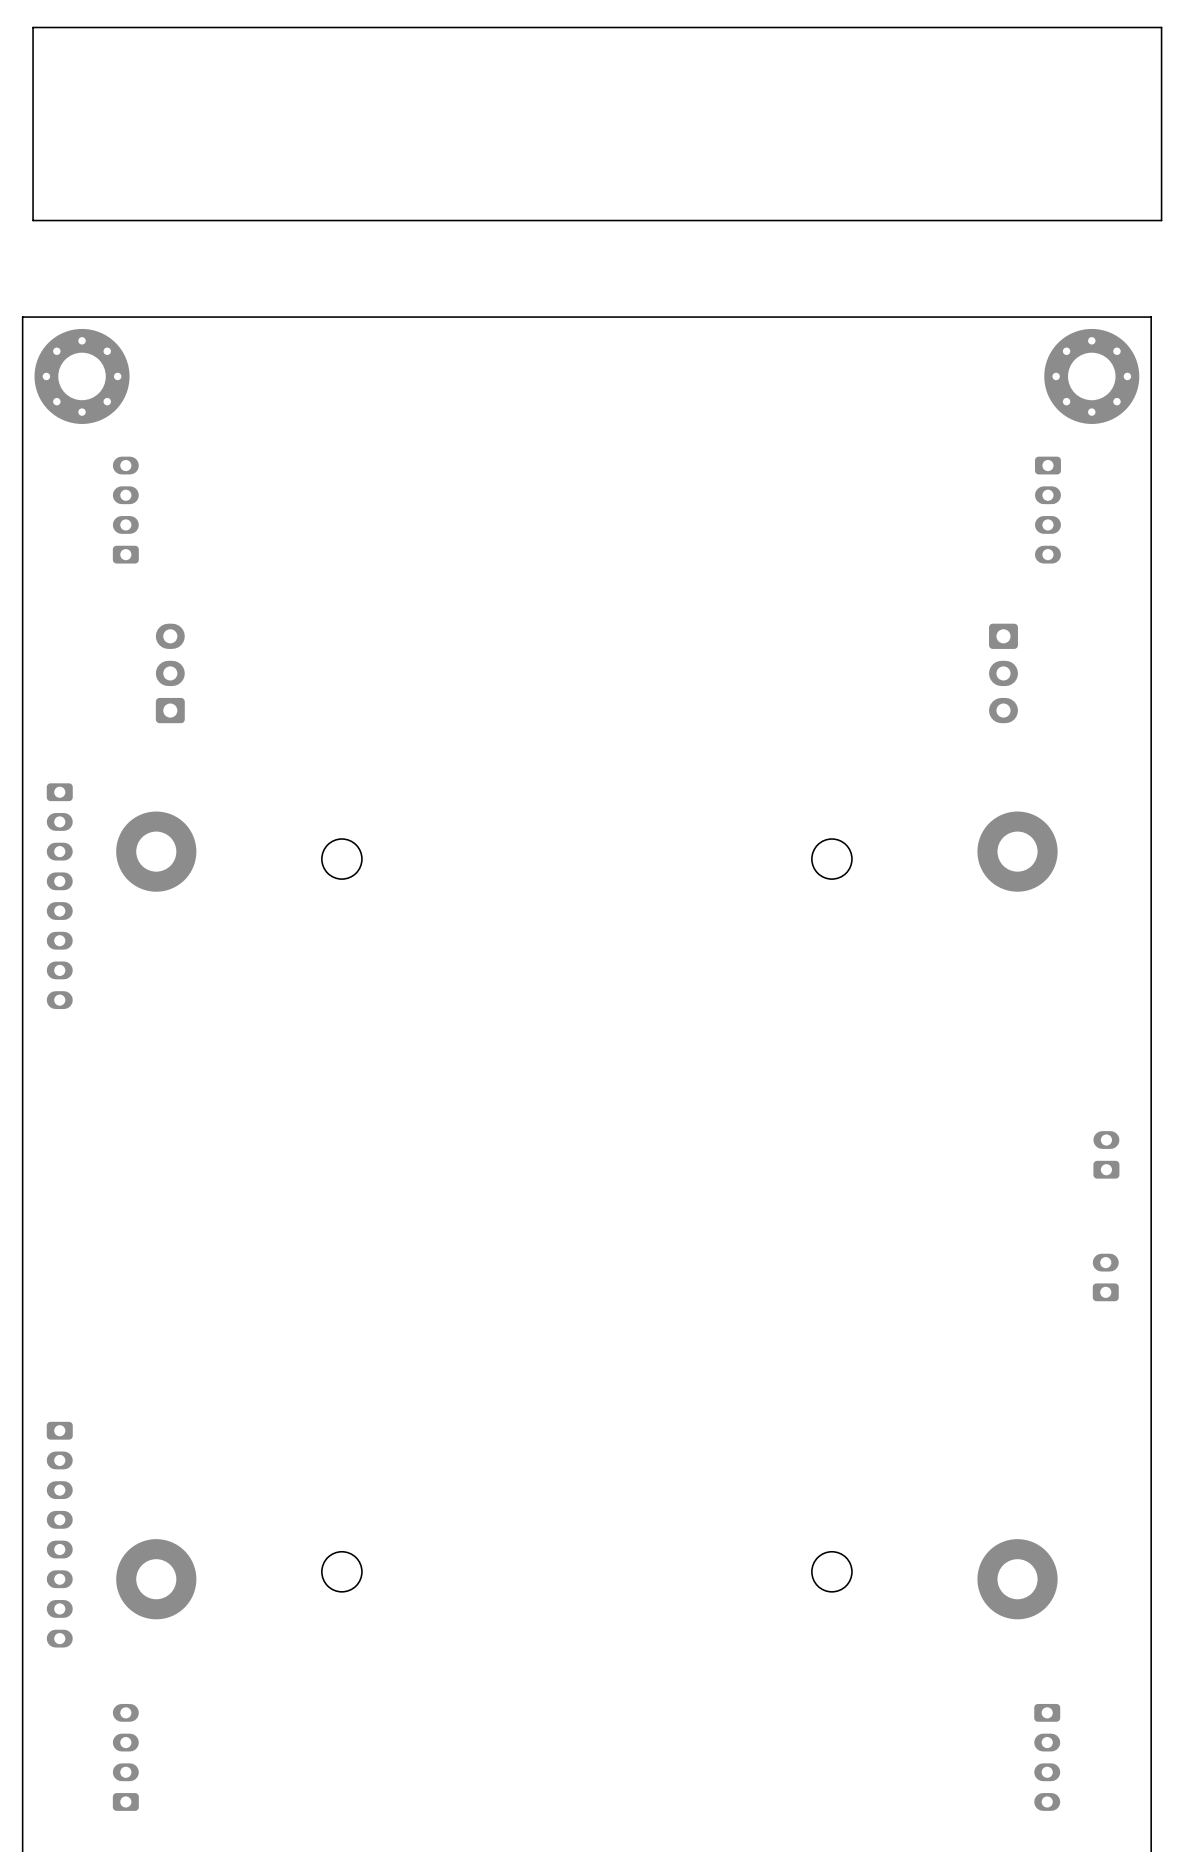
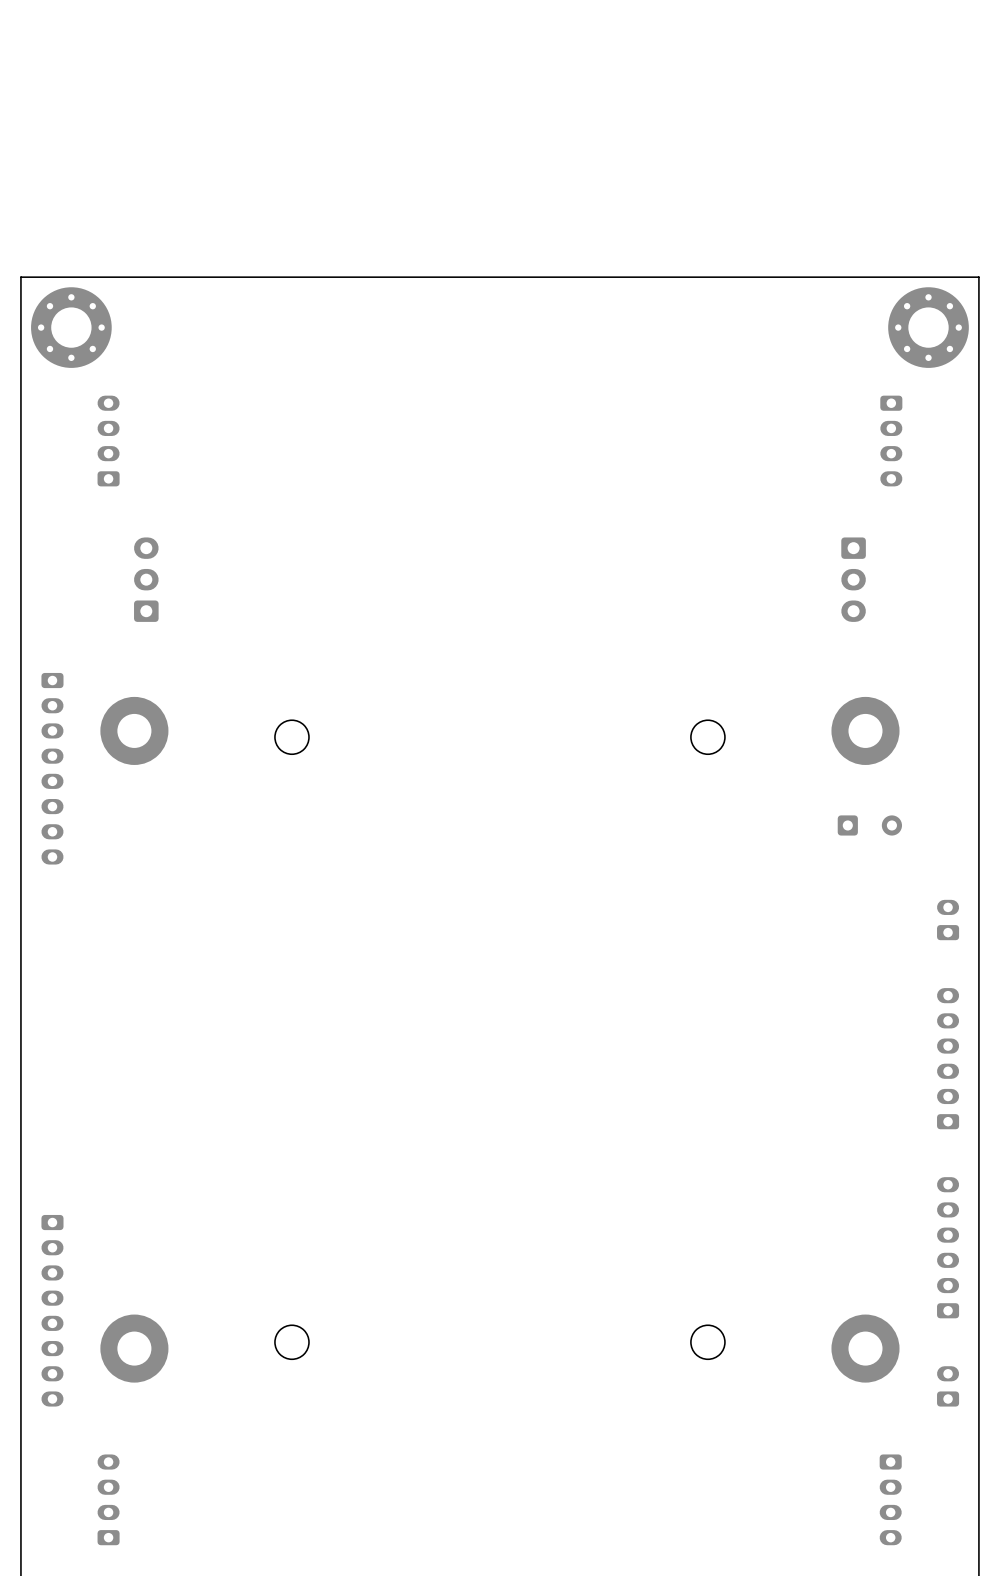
board edge: (1161, 27) (33, 27) (33, 220) (1161, 220) (1161, 27) -> none
part: none -> (869, 825)
part position: (1106, 1154) -> (948, 920)
part: none -> (948, 1058)
part: (1105, 1277) -> none
part: none -> (948, 1247)
part: none -> (948, 1386)

